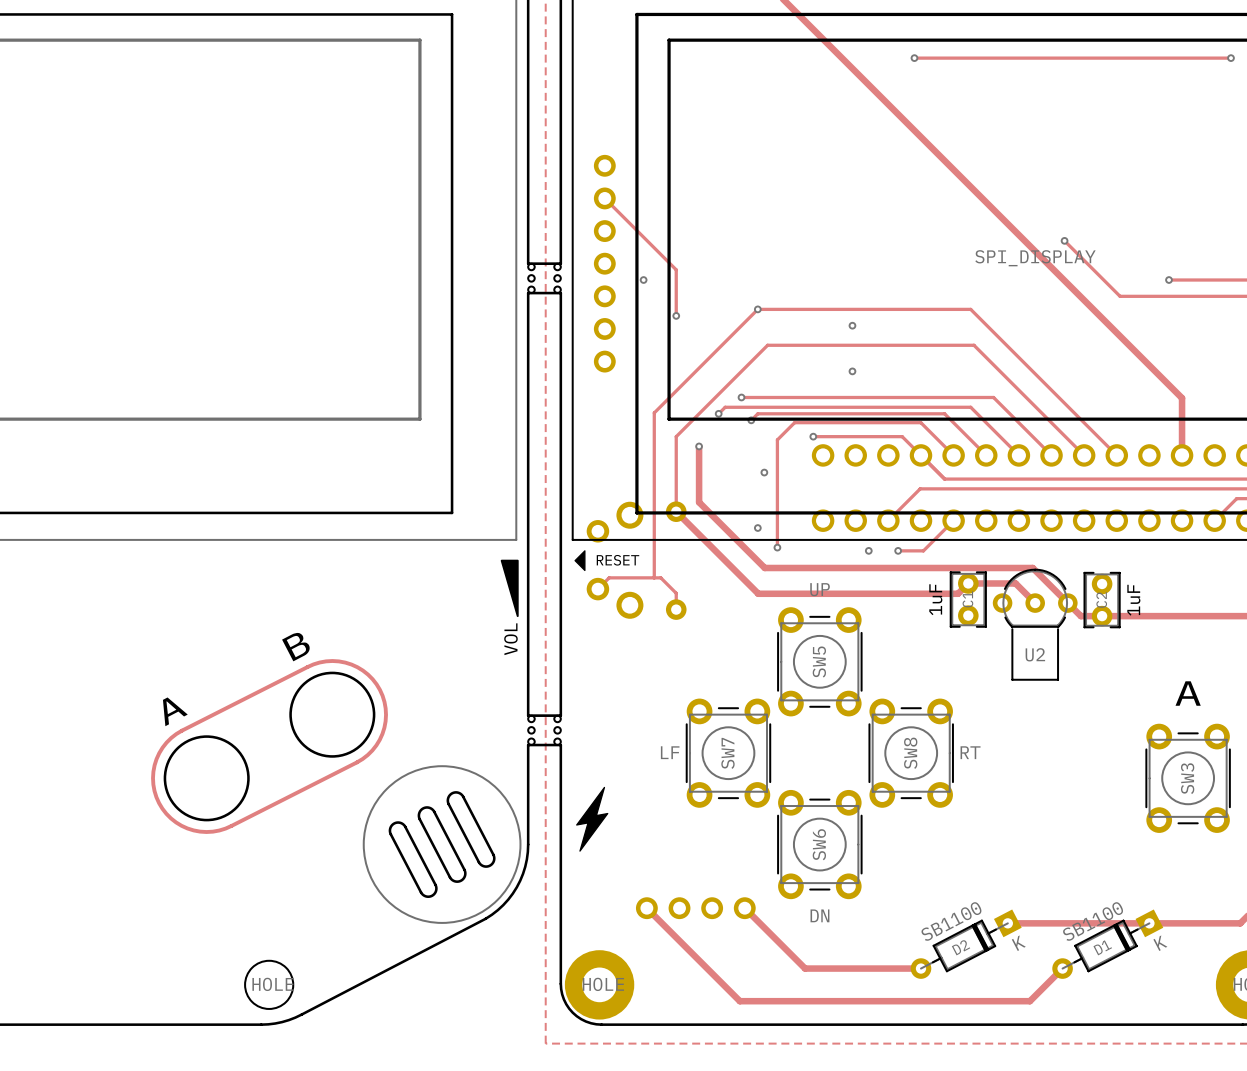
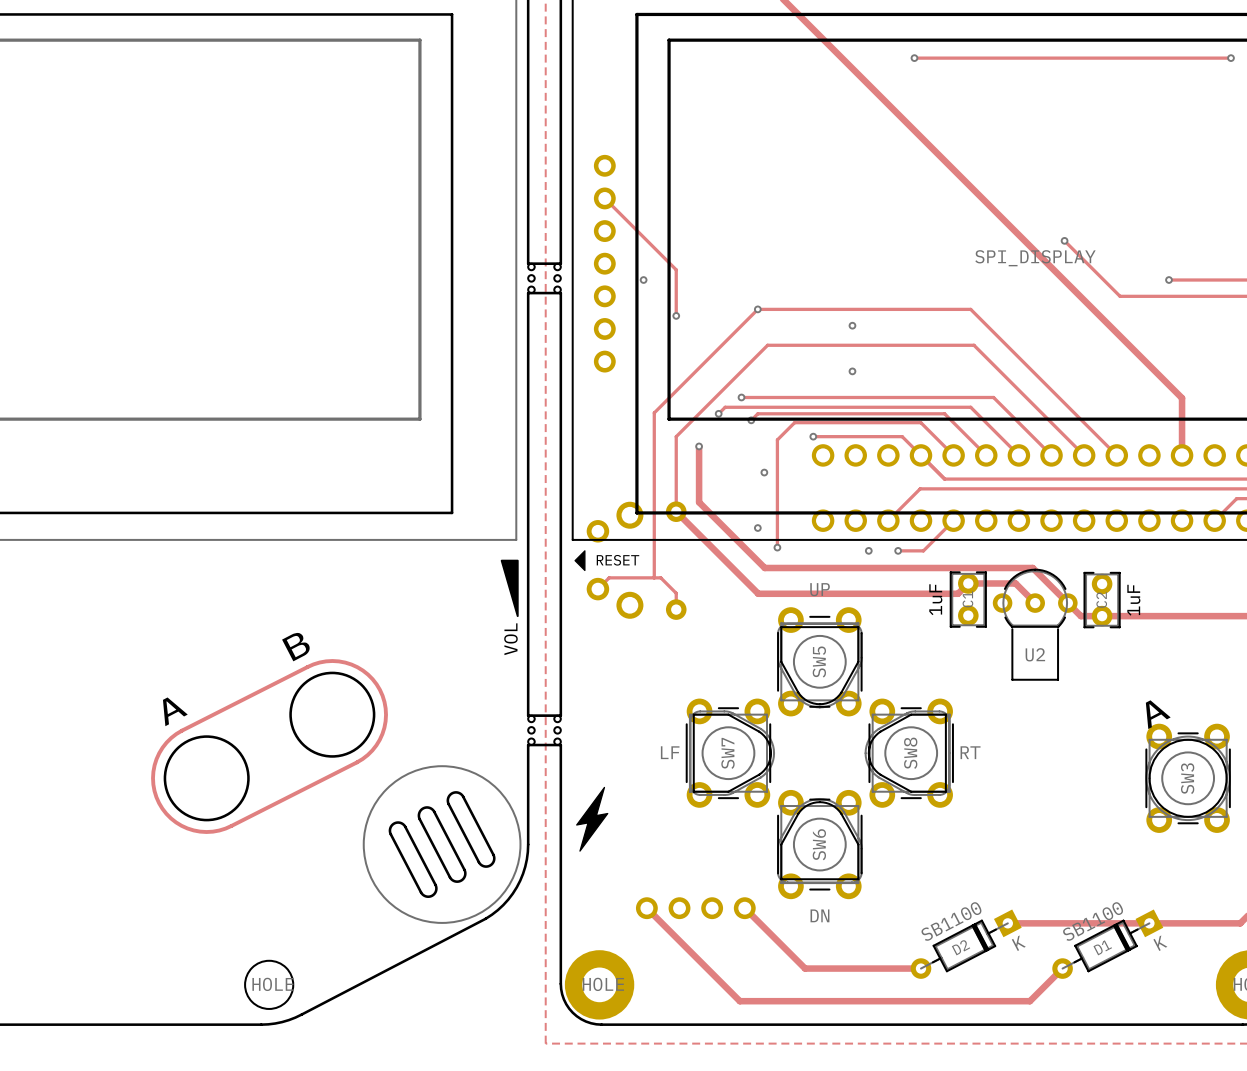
drawing: none -> [689, 623, 950, 884]
text: A (1188, 693) -> none
drawing: none -> [1145, 735, 1231, 821]

